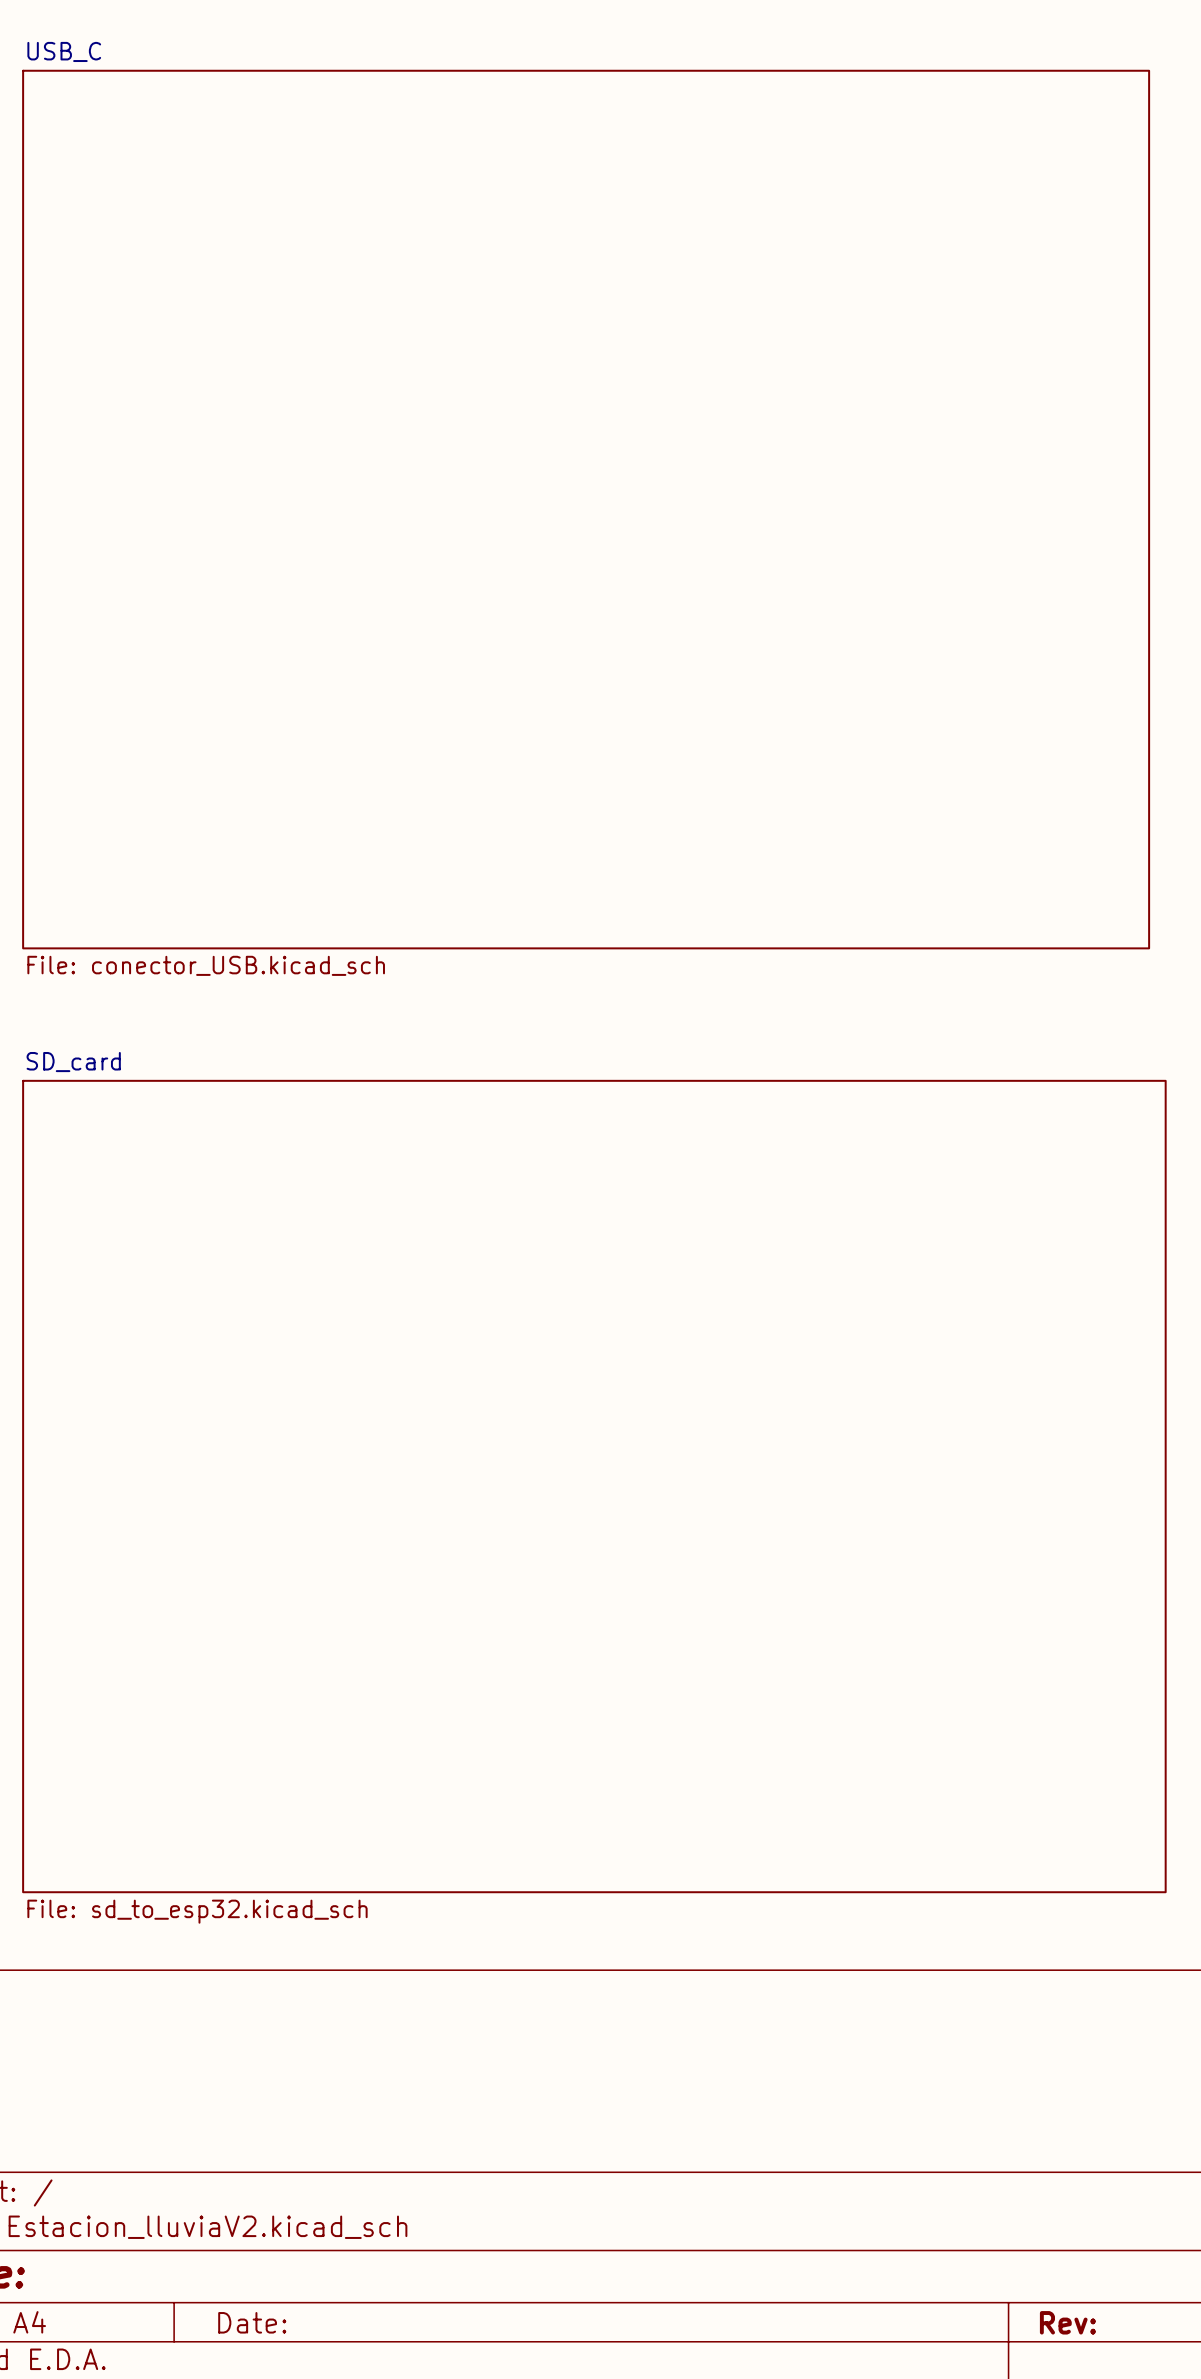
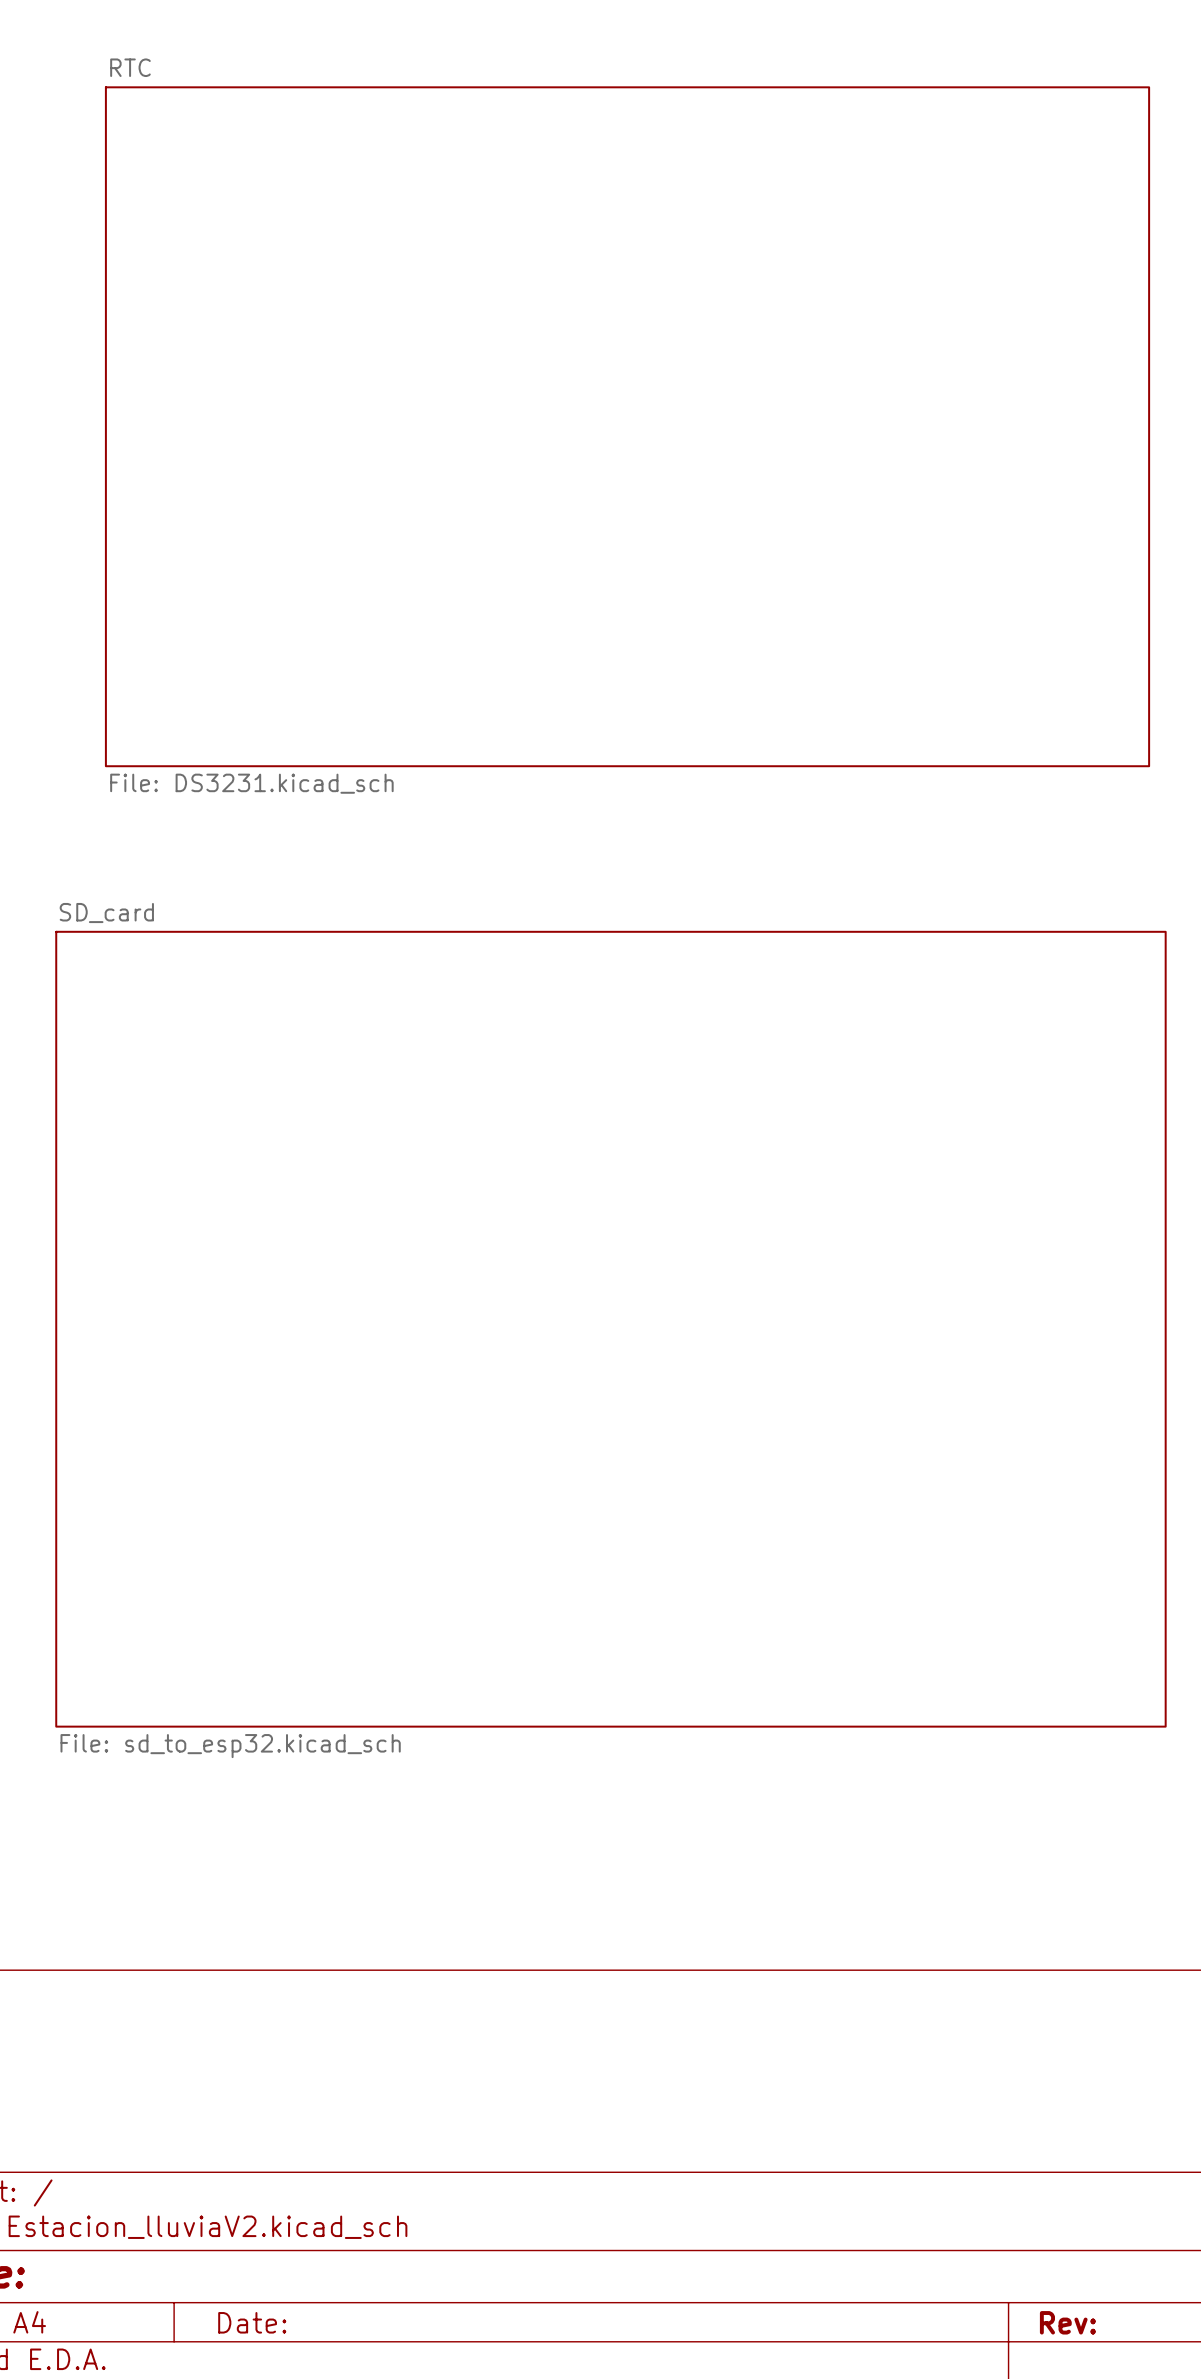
sheet RTC: none -> File: DS3231.kicad_sch (627, 426)
sheet USB_C: File: conector_USB.kicad_sch (586, 509) -> none
sheet SD_card: none -> File: sd_to_esp32.kicad_sch (610, 1329)
sheet SD_card: File: sd_to_esp32.kicad_sch (594, 1486) -> none

